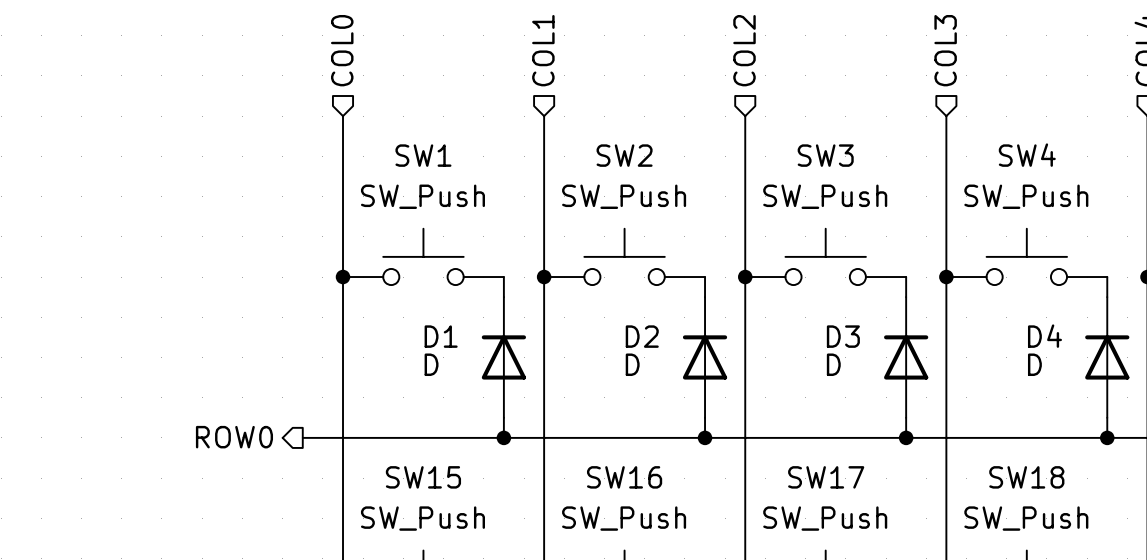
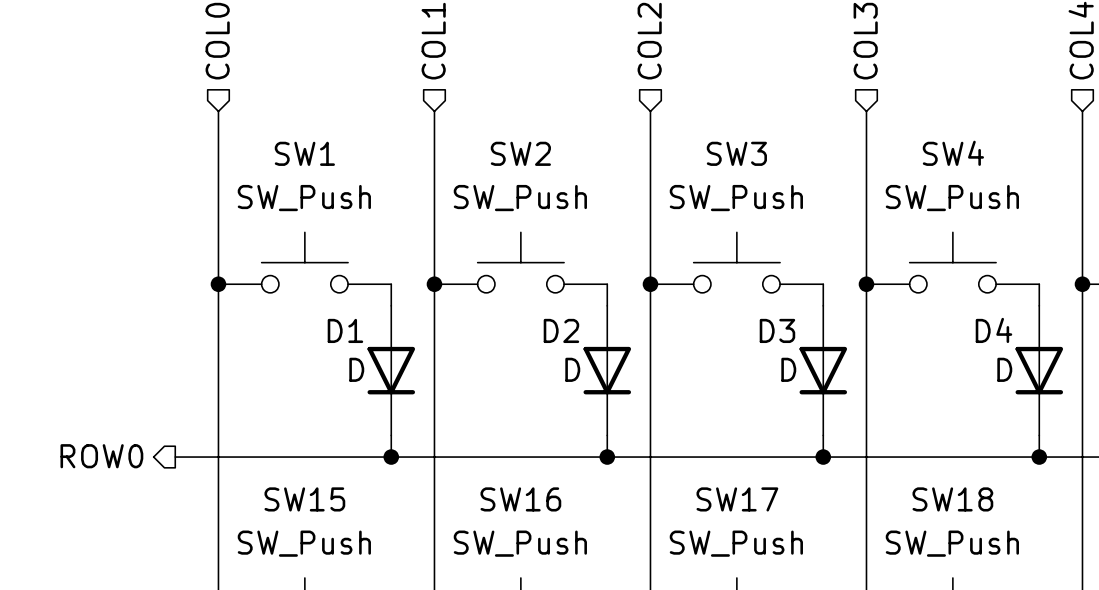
D1 rotation: 0° (503, 357) -> 180° (391, 370)
D2 rotation: 0° (705, 357) -> 180° (607, 370)
D3 rotation: 0° (906, 357) -> 180° (823, 370)
D4 rotation: 0° (1107, 357) -> 180° (1039, 370)
D1 value position: D (431, 364) -> D (356, 369)
D2 value position: D (632, 364) -> D (572, 369)
D3 value position: D (833, 364) -> D (788, 369)
D4 value position: D (1034, 364) -> D (1004, 369)

